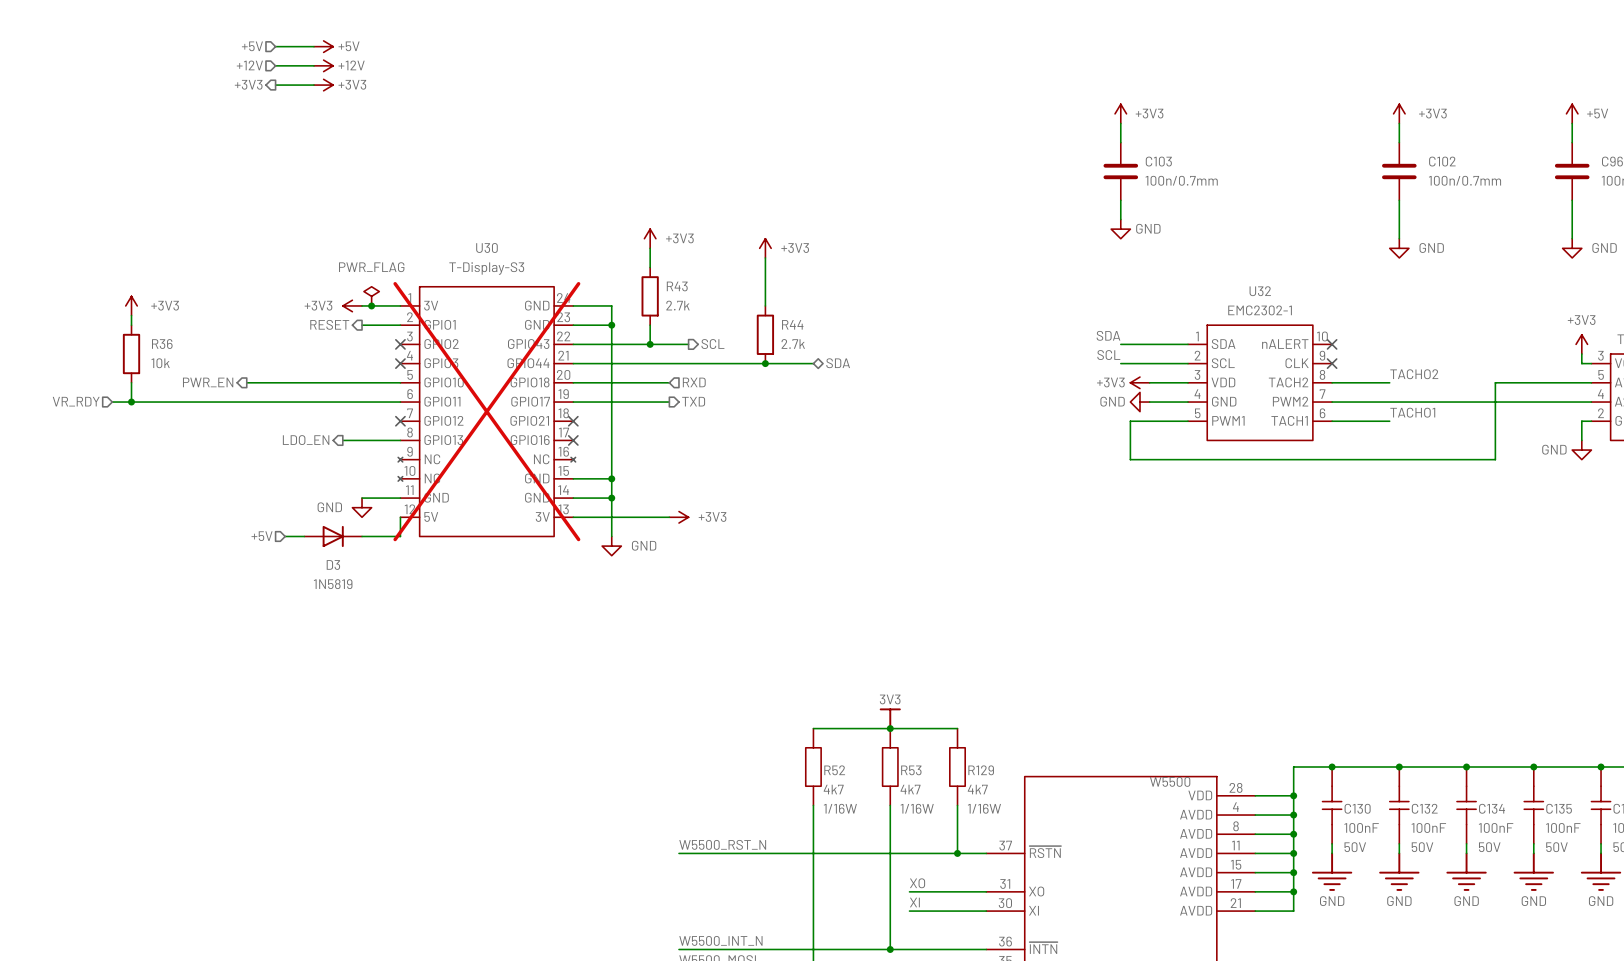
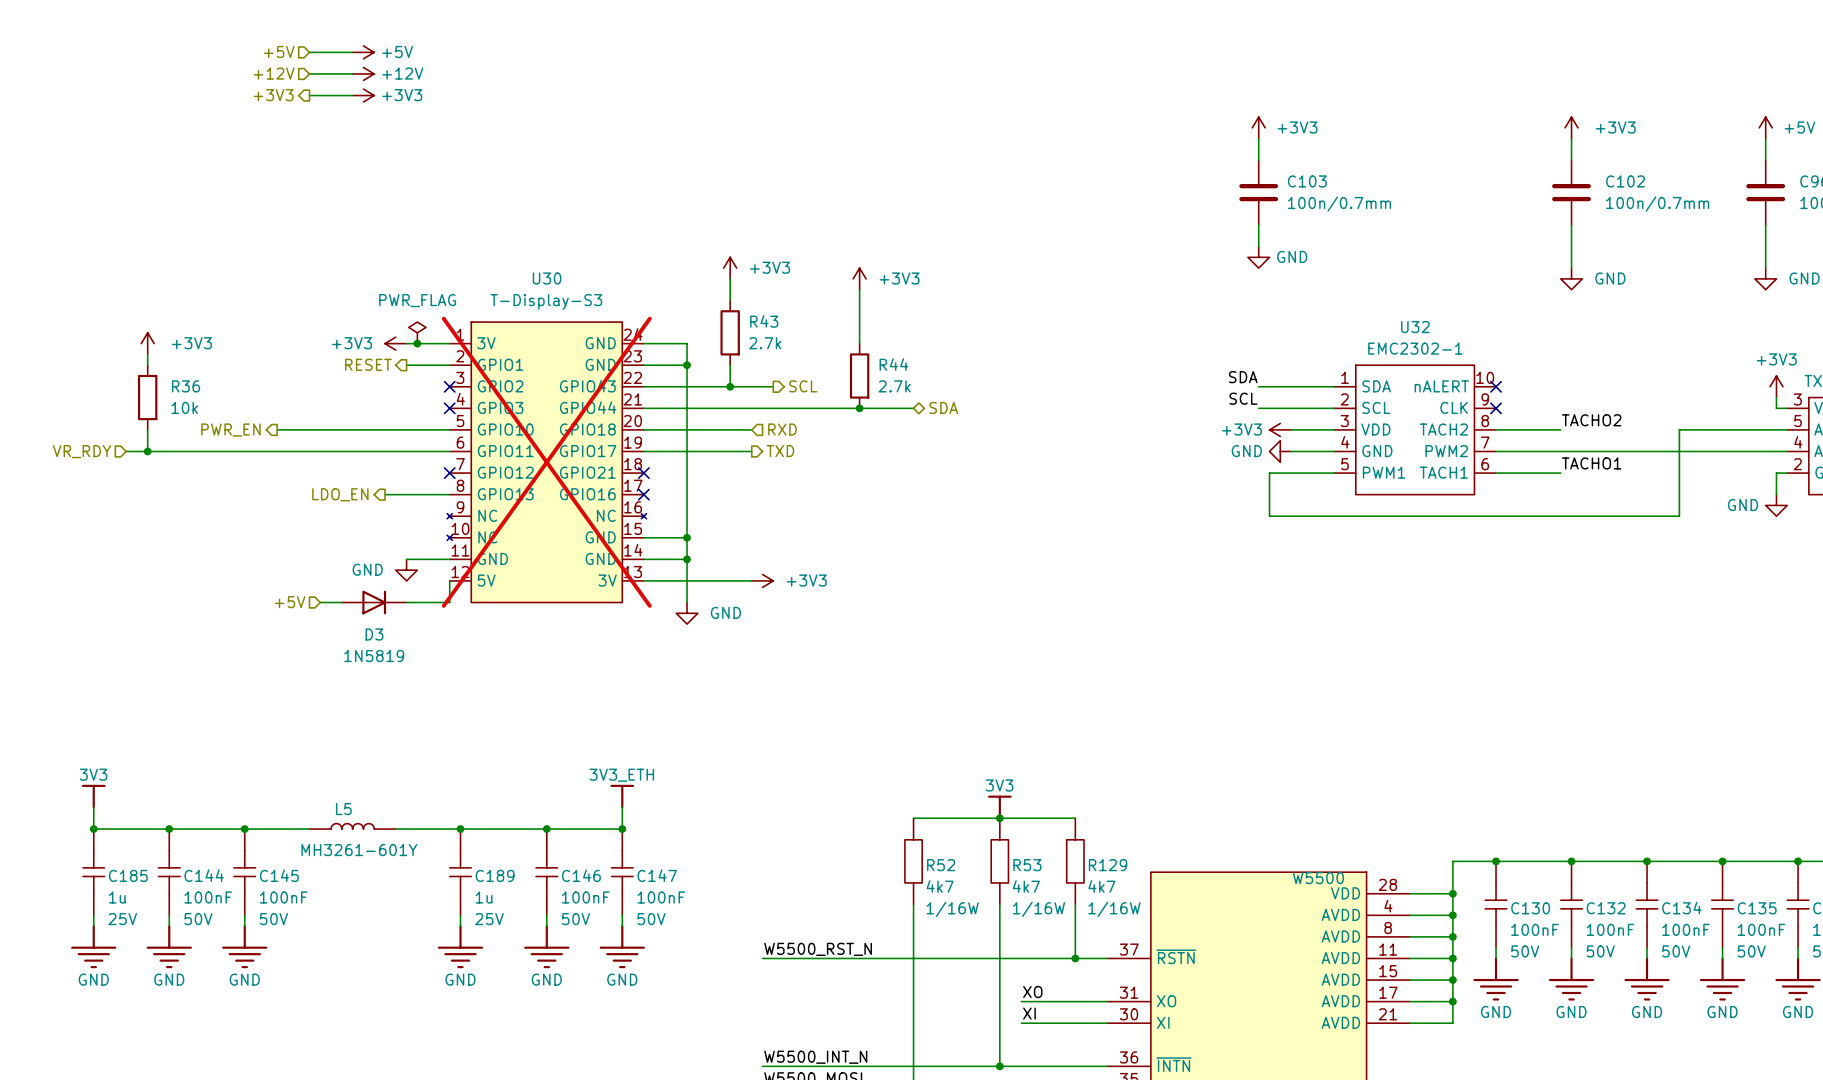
power symbol: none -> 3V3 (93, 796)
power symbol: none -> 3V3_ETH (622, 796)
wire: none -> (93, 807) (93, 829) (309, 829)
wire: none -> (622, 807) (622, 829) (395, 829)
L5: none -> (352, 826)
junction: none -> (93, 829)
junction: none -> (169, 829)
junction: none -> (244, 829)
junction: none -> (460, 829)
junction: none -> (546, 829)
junction: none -> (622, 829)
C185: none -> (93, 872)
C144: none -> (169, 872)
C145: none -> (244, 872)
C189: none -> (460, 872)
C146: none -> (546, 872)
C147: none -> (622, 872)
wire: none -> (93, 915) (93, 926)
wire: none -> (169, 915) (169, 926)
wire: none -> (244, 915) (244, 926)
wire: none -> (460, 915) (460, 926)
wire: none -> (546, 915) (546, 926)
wire: none -> (622, 915) (622, 926)
power symbol: none -> GND (93, 946)
power symbol: none -> GND (169, 946)
power symbol: none -> GND (244, 946)
power symbol: none -> GND (460, 946)
power symbol: none -> GND (546, 946)
power symbol: none -> GND (622, 946)

